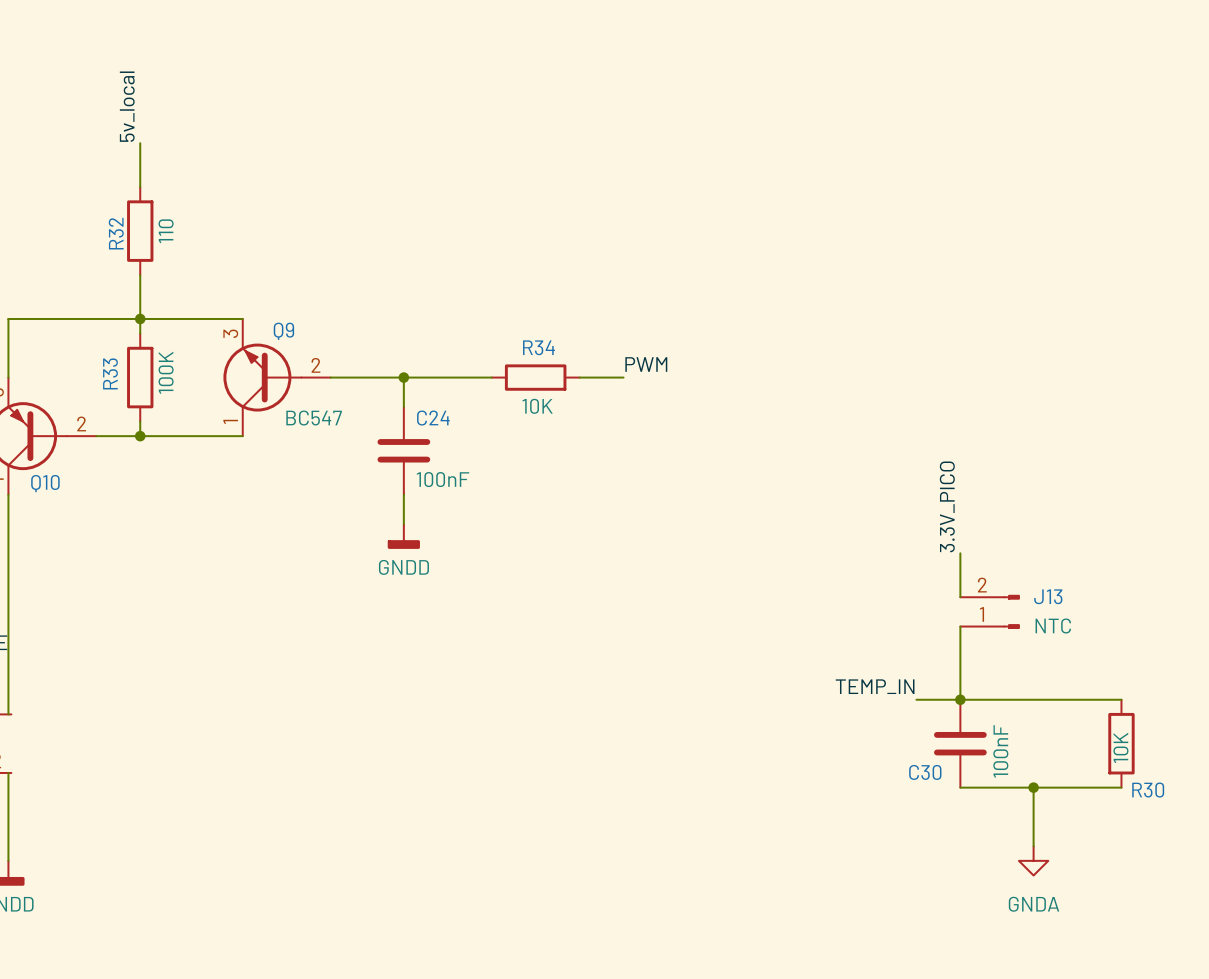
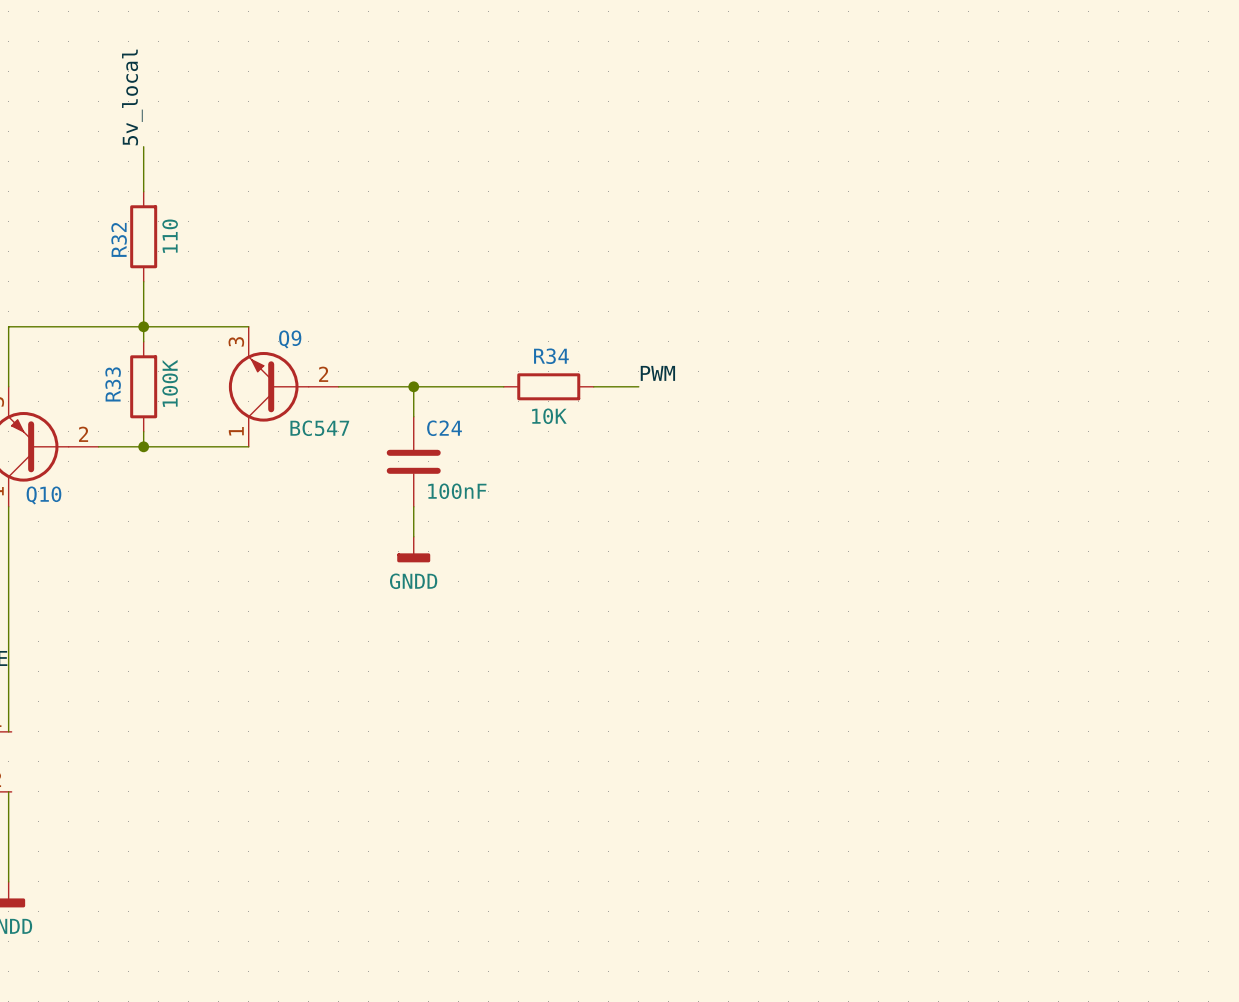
label: 3.3V_PICO (947, 506) -> none
wire: (960, 553) (960, 597) -> none
J13: NTC (990, 611) -> none
wire: (960, 626) (960, 699) -> none
label: TEMP_IN (875, 686) -> none
wire: (916, 699) (1121, 699) -> none
junction: (960, 699) -> none
C30: 100nF (960, 743) -> none
R30: 10K (1121, 743) -> none
wire: (960, 787) (1121, 787) -> none
wire: (1033, 787) (1033, 846) -> none
junction: (1033, 787) -> none
power symbol: GNDA (1033, 860) -> none

